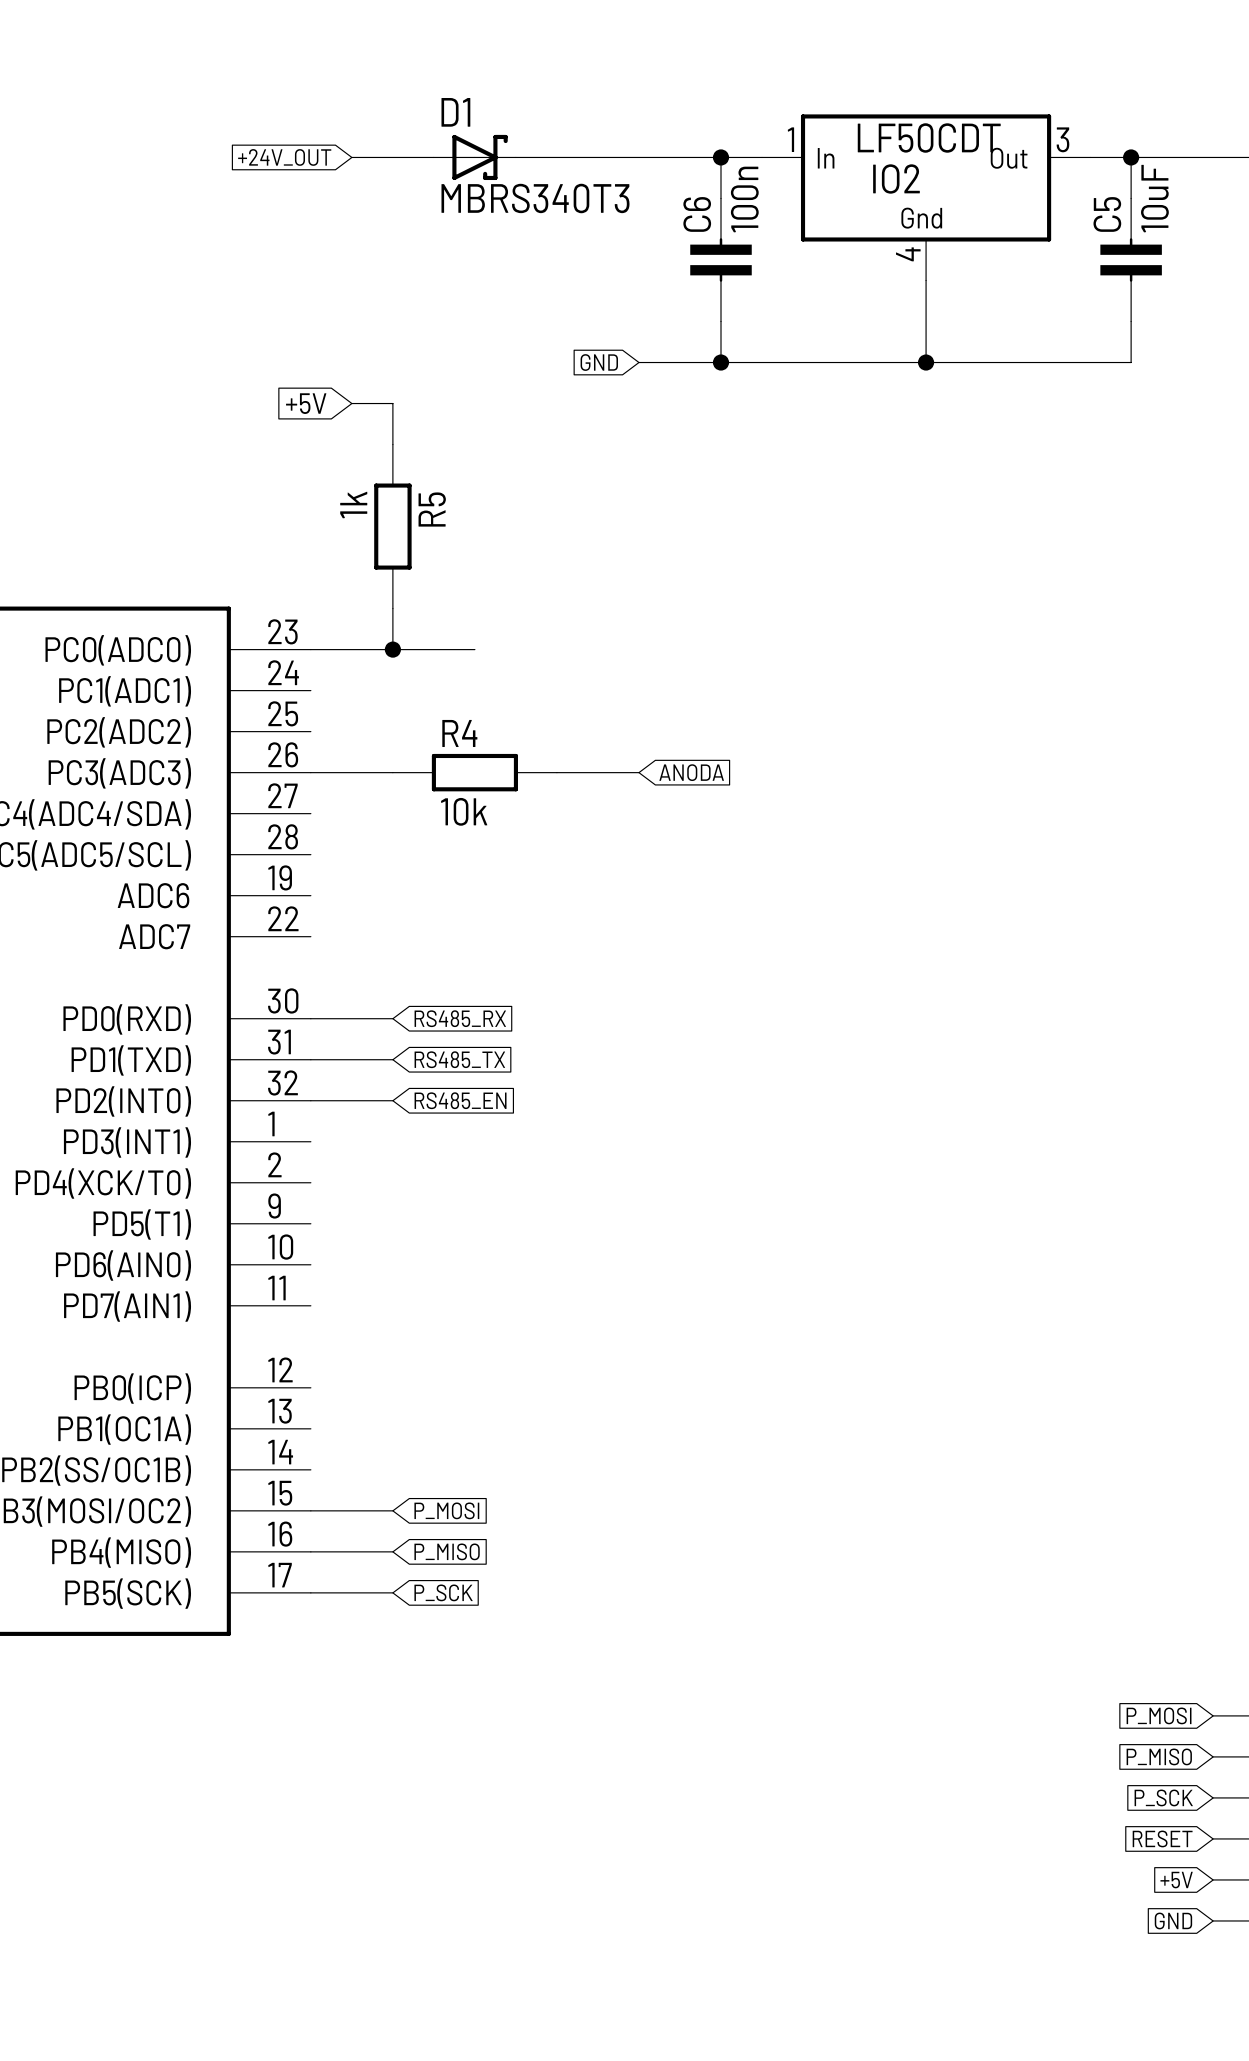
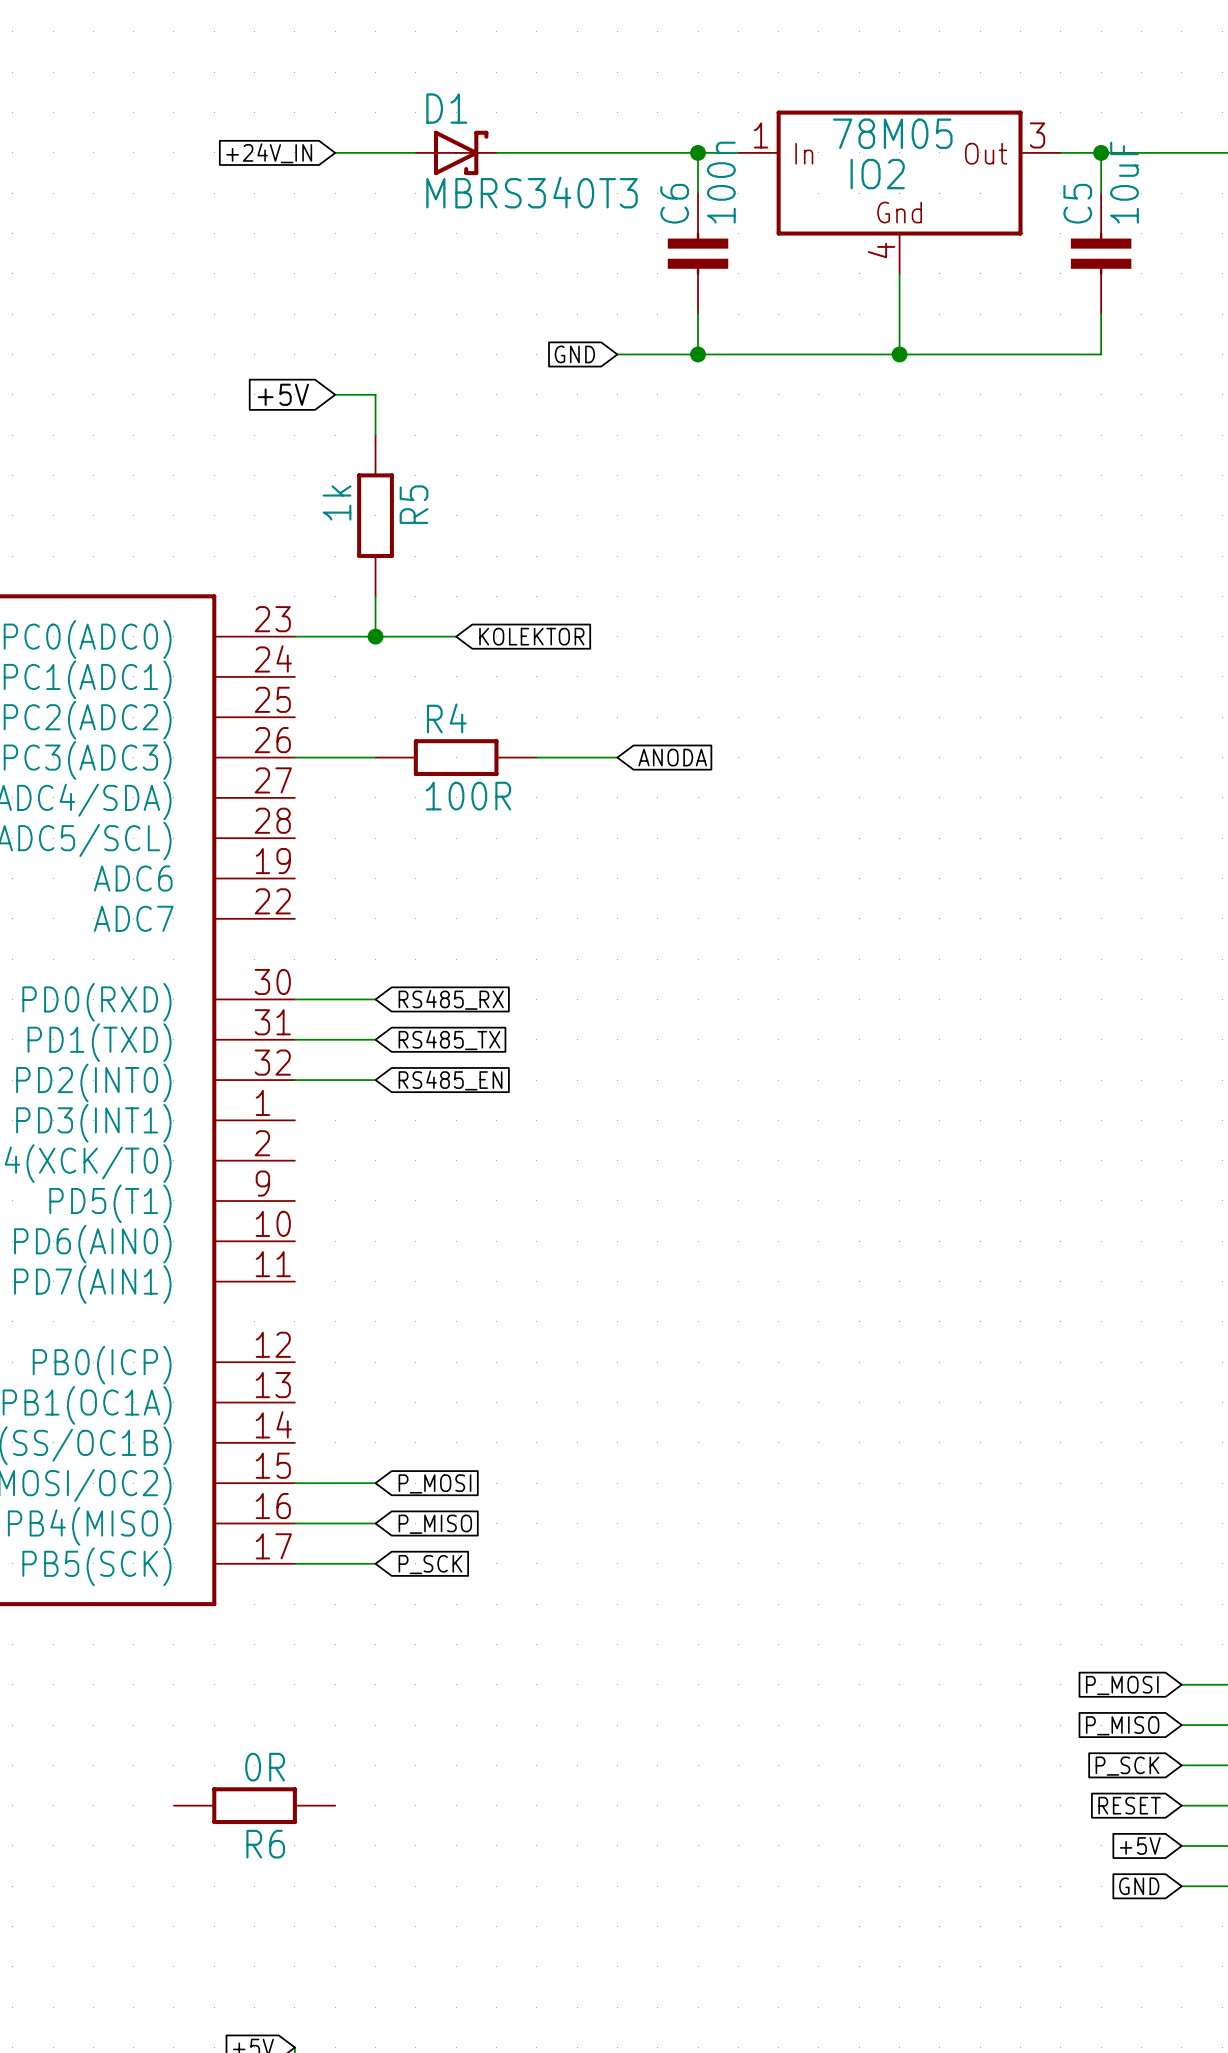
IO2 value: LF50CDT (929, 138) -> 78M05 (892, 133)
global label: +24V_OUT (284, 157) -> +24V_IN (269, 153)
global label: none -> KOLEKTOR (531, 636)
R4 value: 10k (464, 811) -> 100R (468, 796)
R6: none -> 0R (254, 1805)

